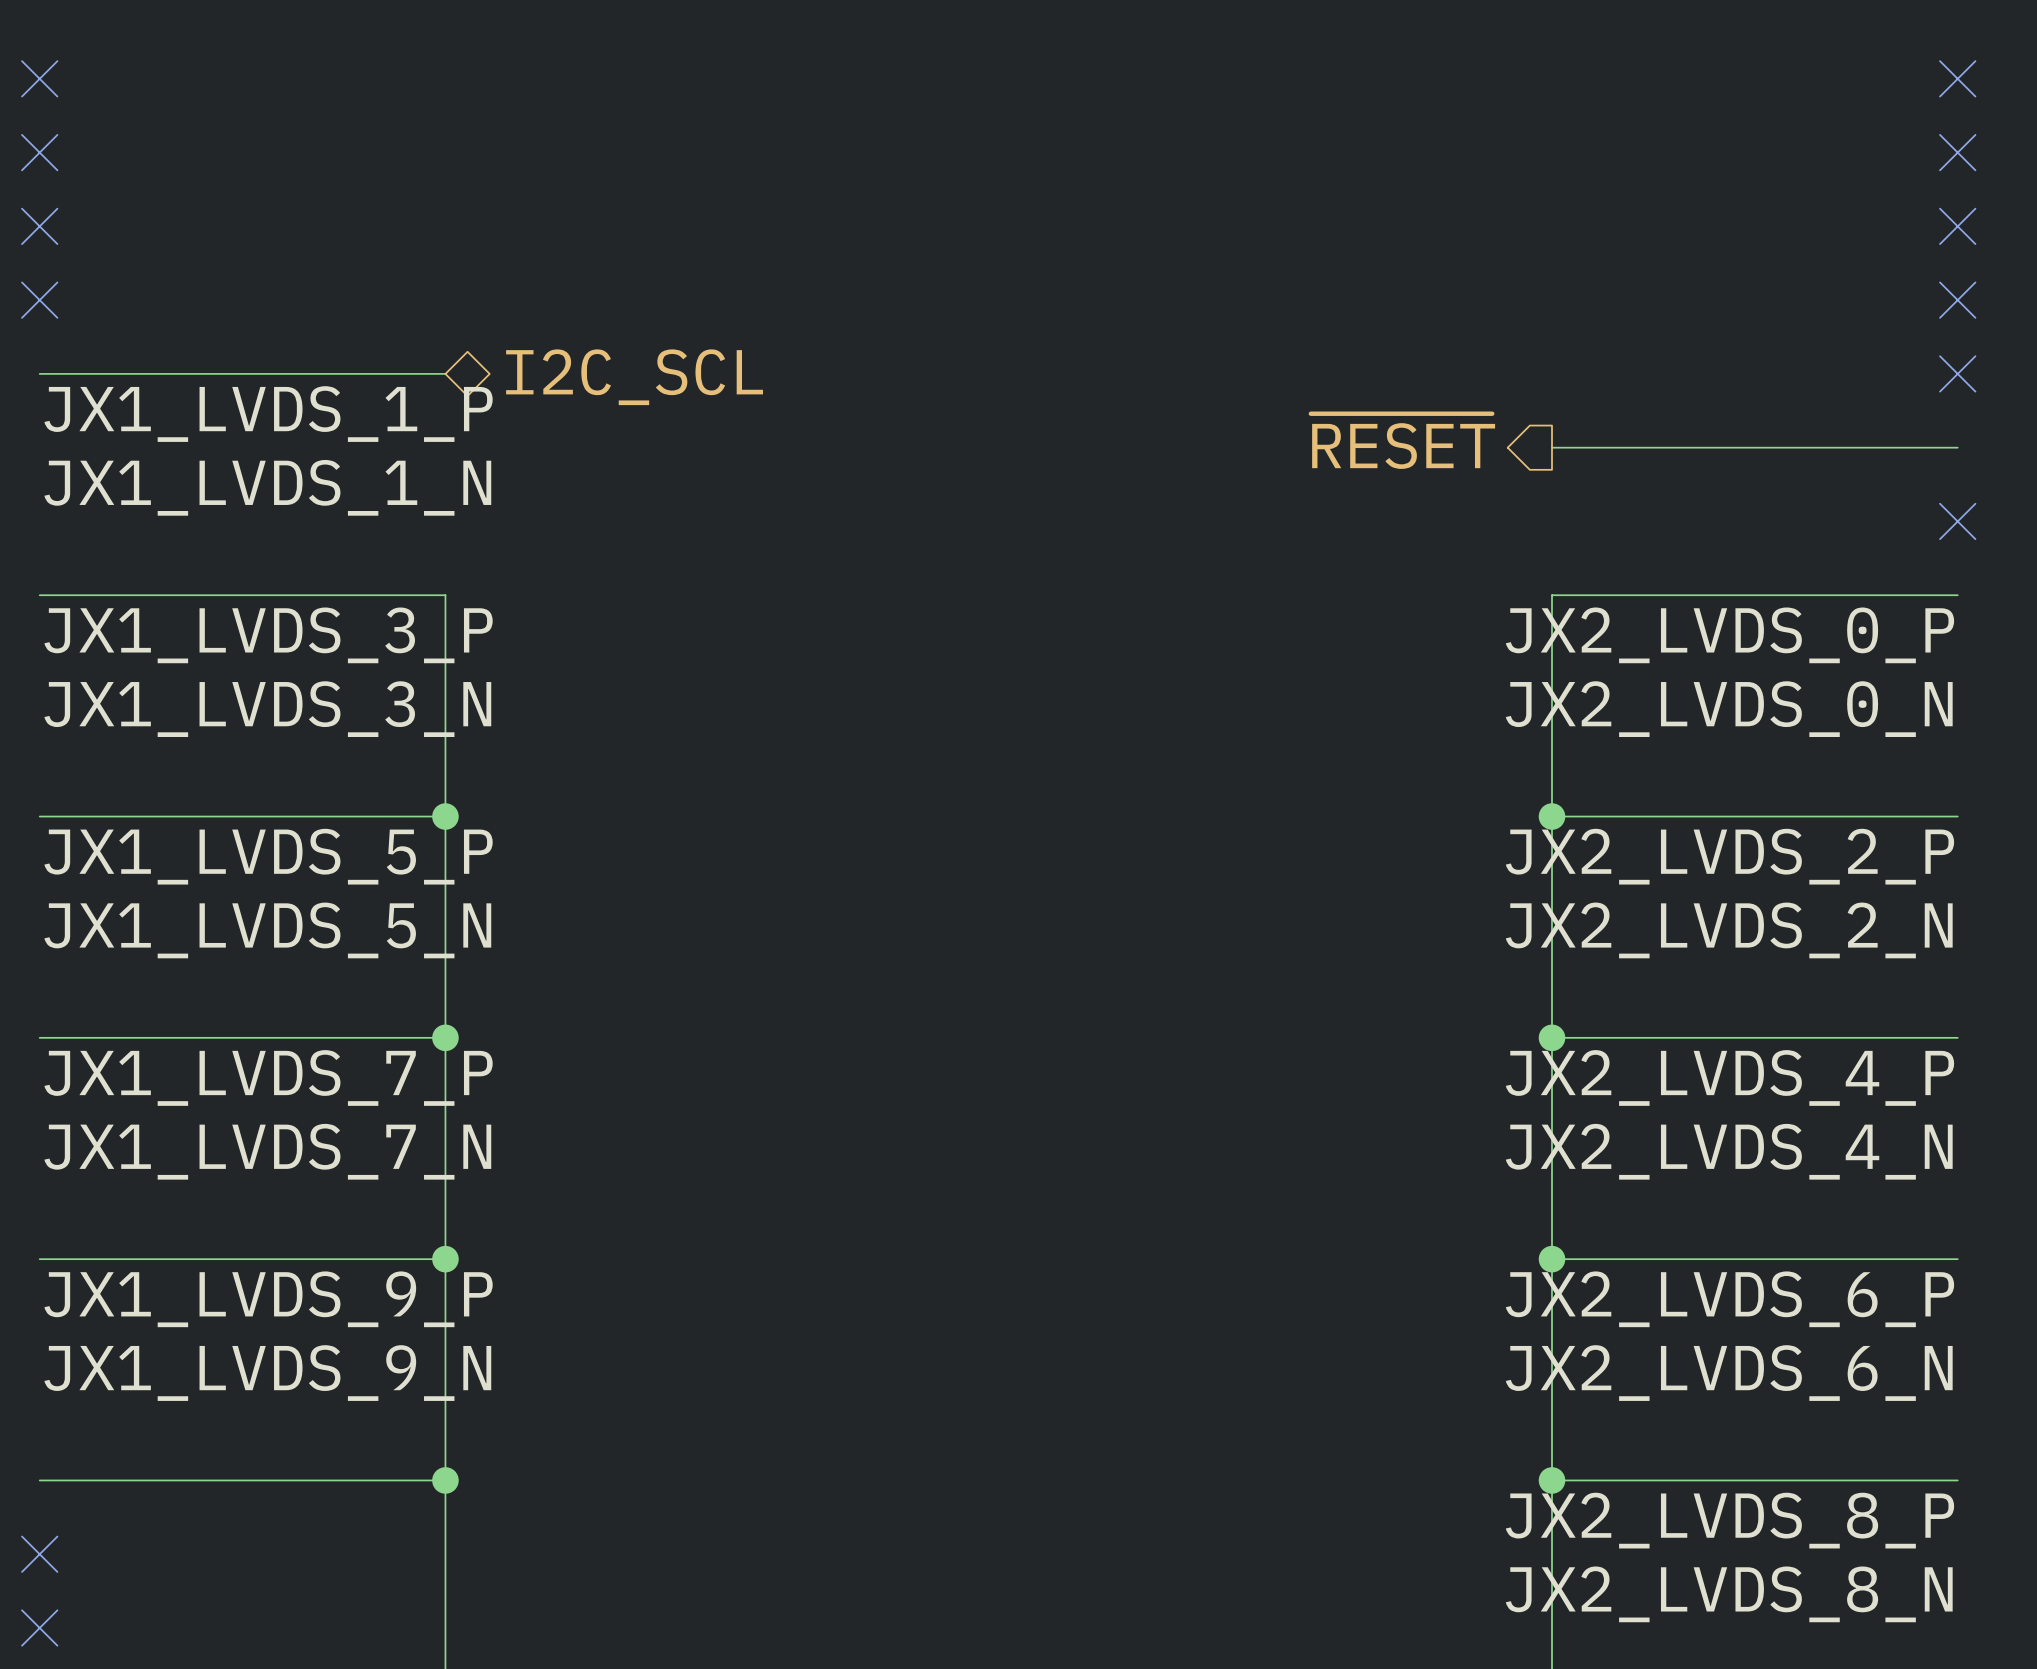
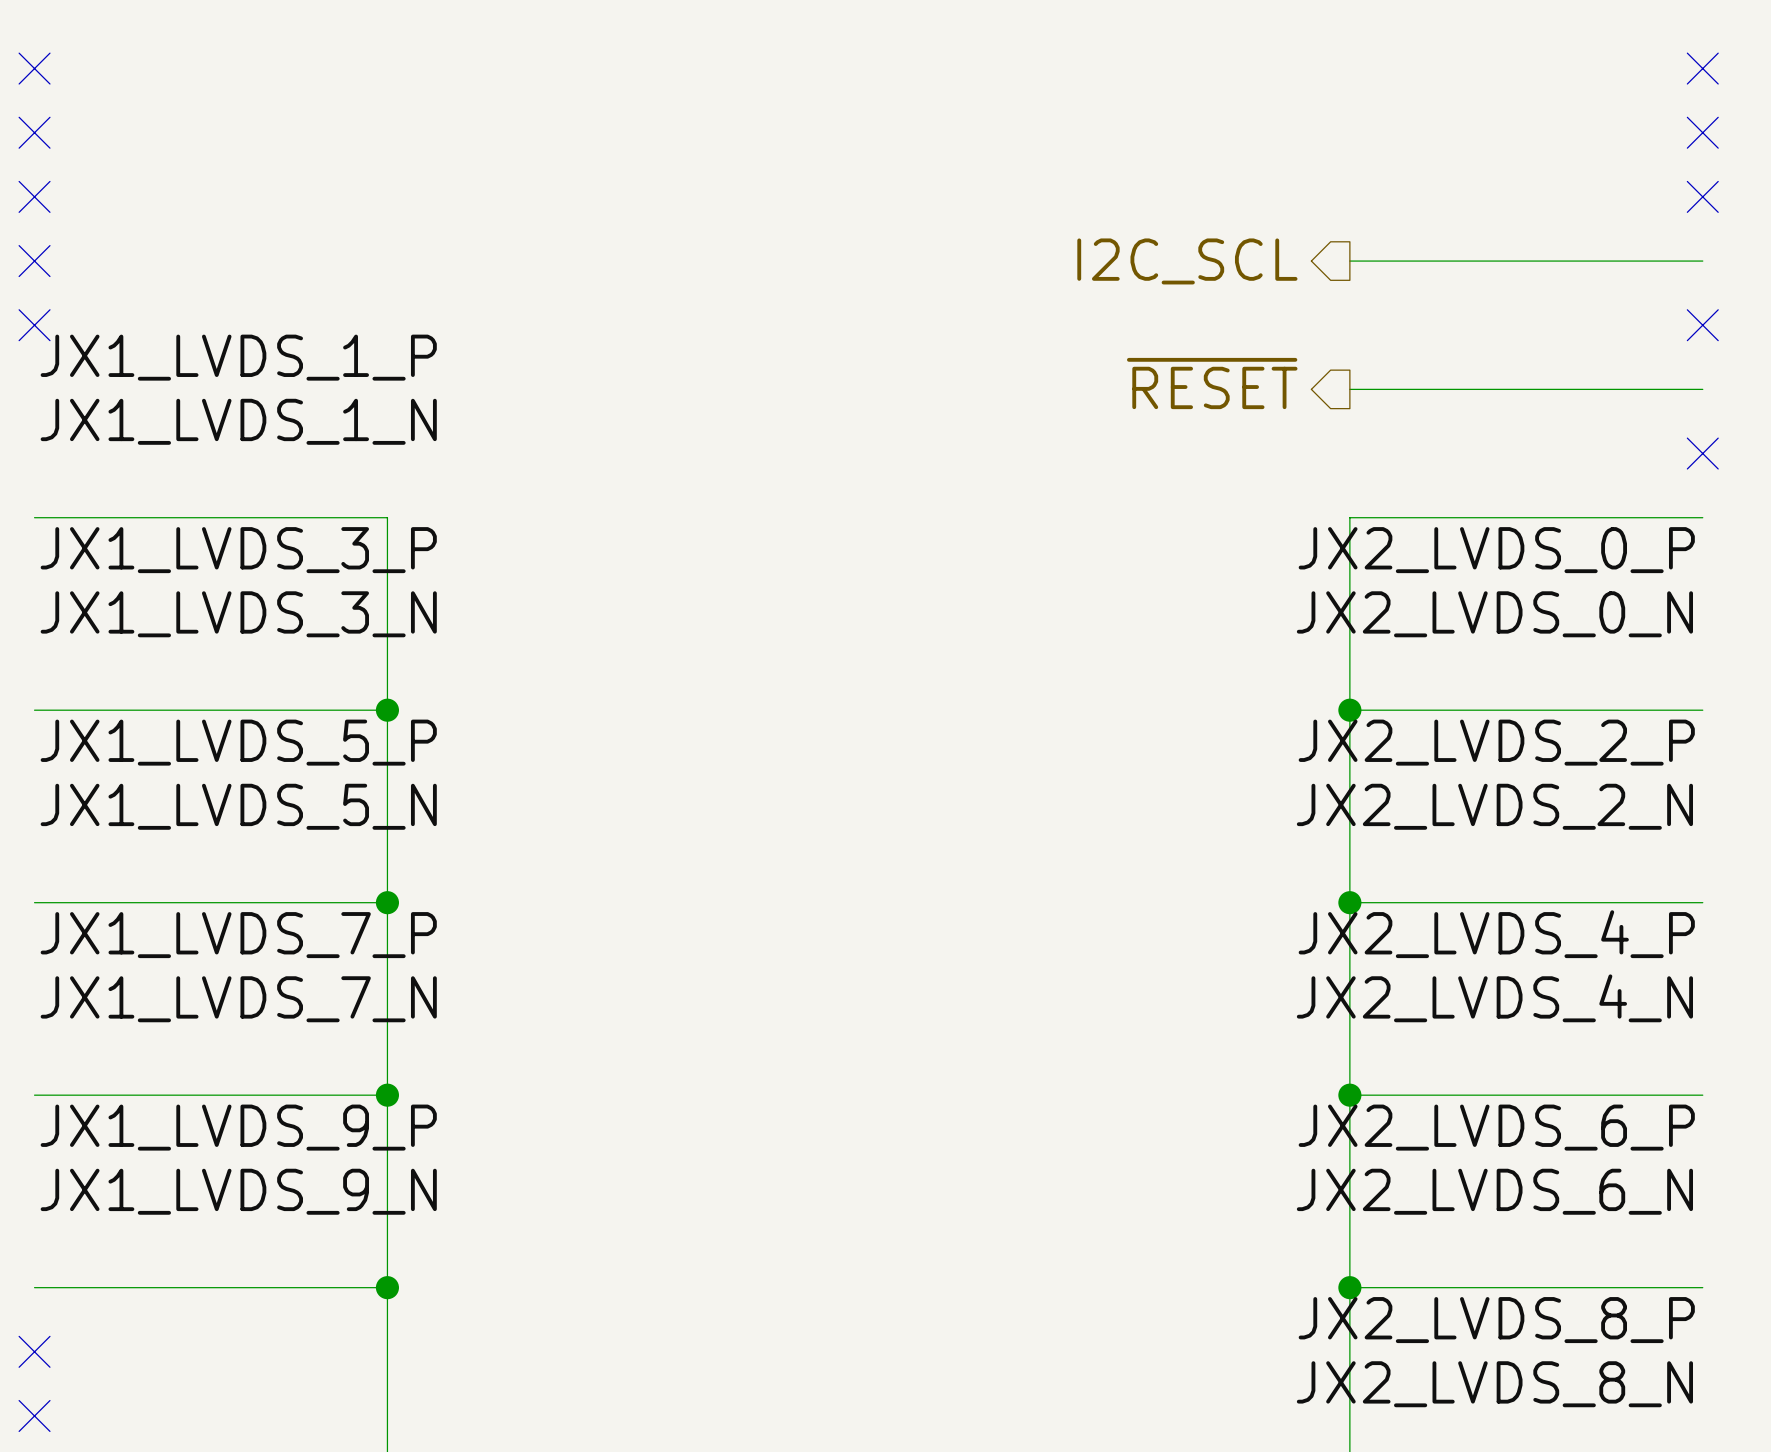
wire: none -> (1349, 261) (1702, 261)
no-connect mark: (1957, 300) -> none
hierarchical label: none -> I2C_SCL (1187, 261)
wire: (39, 373) (445, 373) -> none
no-connect mark: none -> (34, 325)
hierarchical label: I2C_SCL (634, 377) -> none

